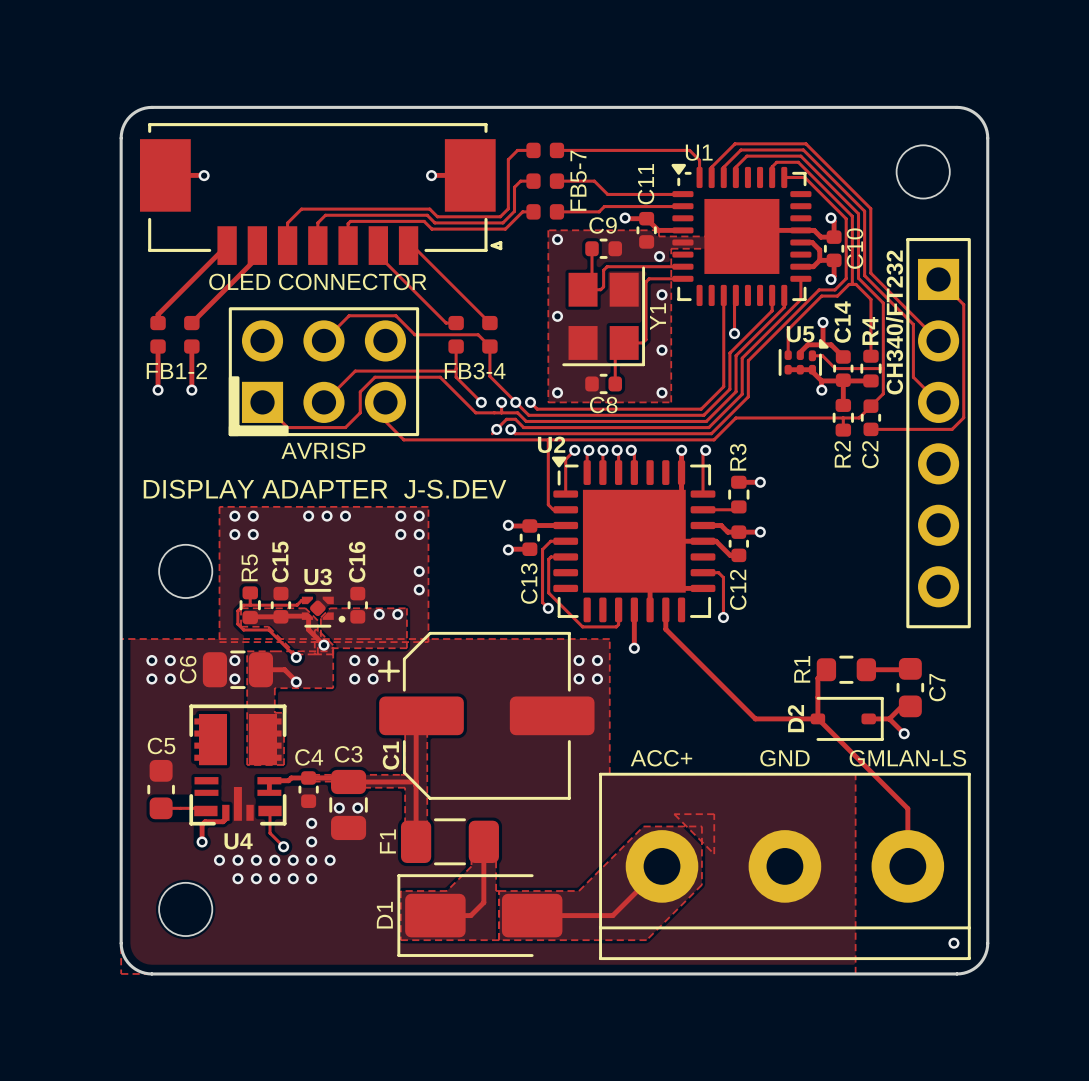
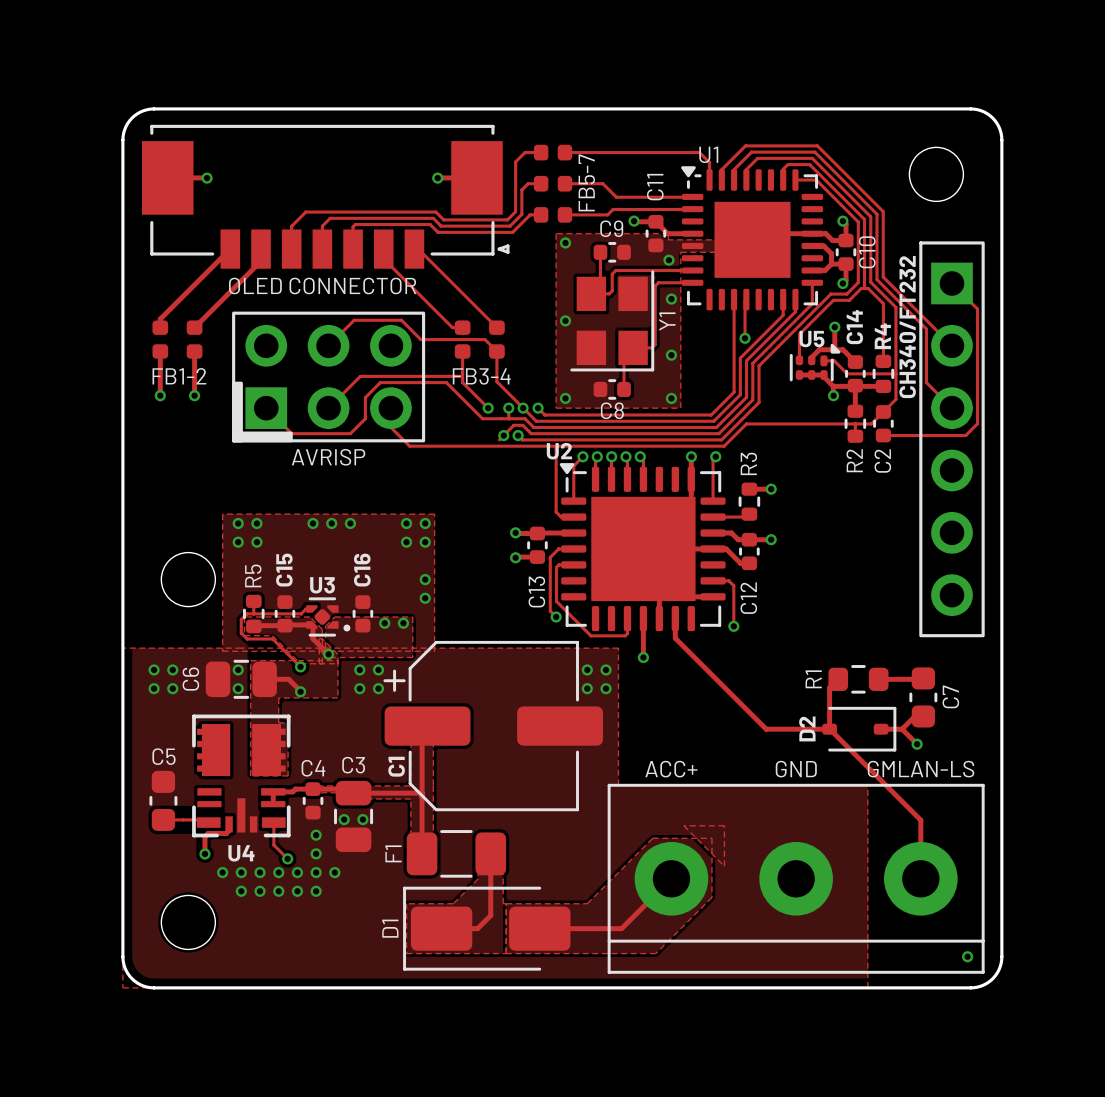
text: DISPLAY ADAPTER J-S.DEV (325, 489) -> none

